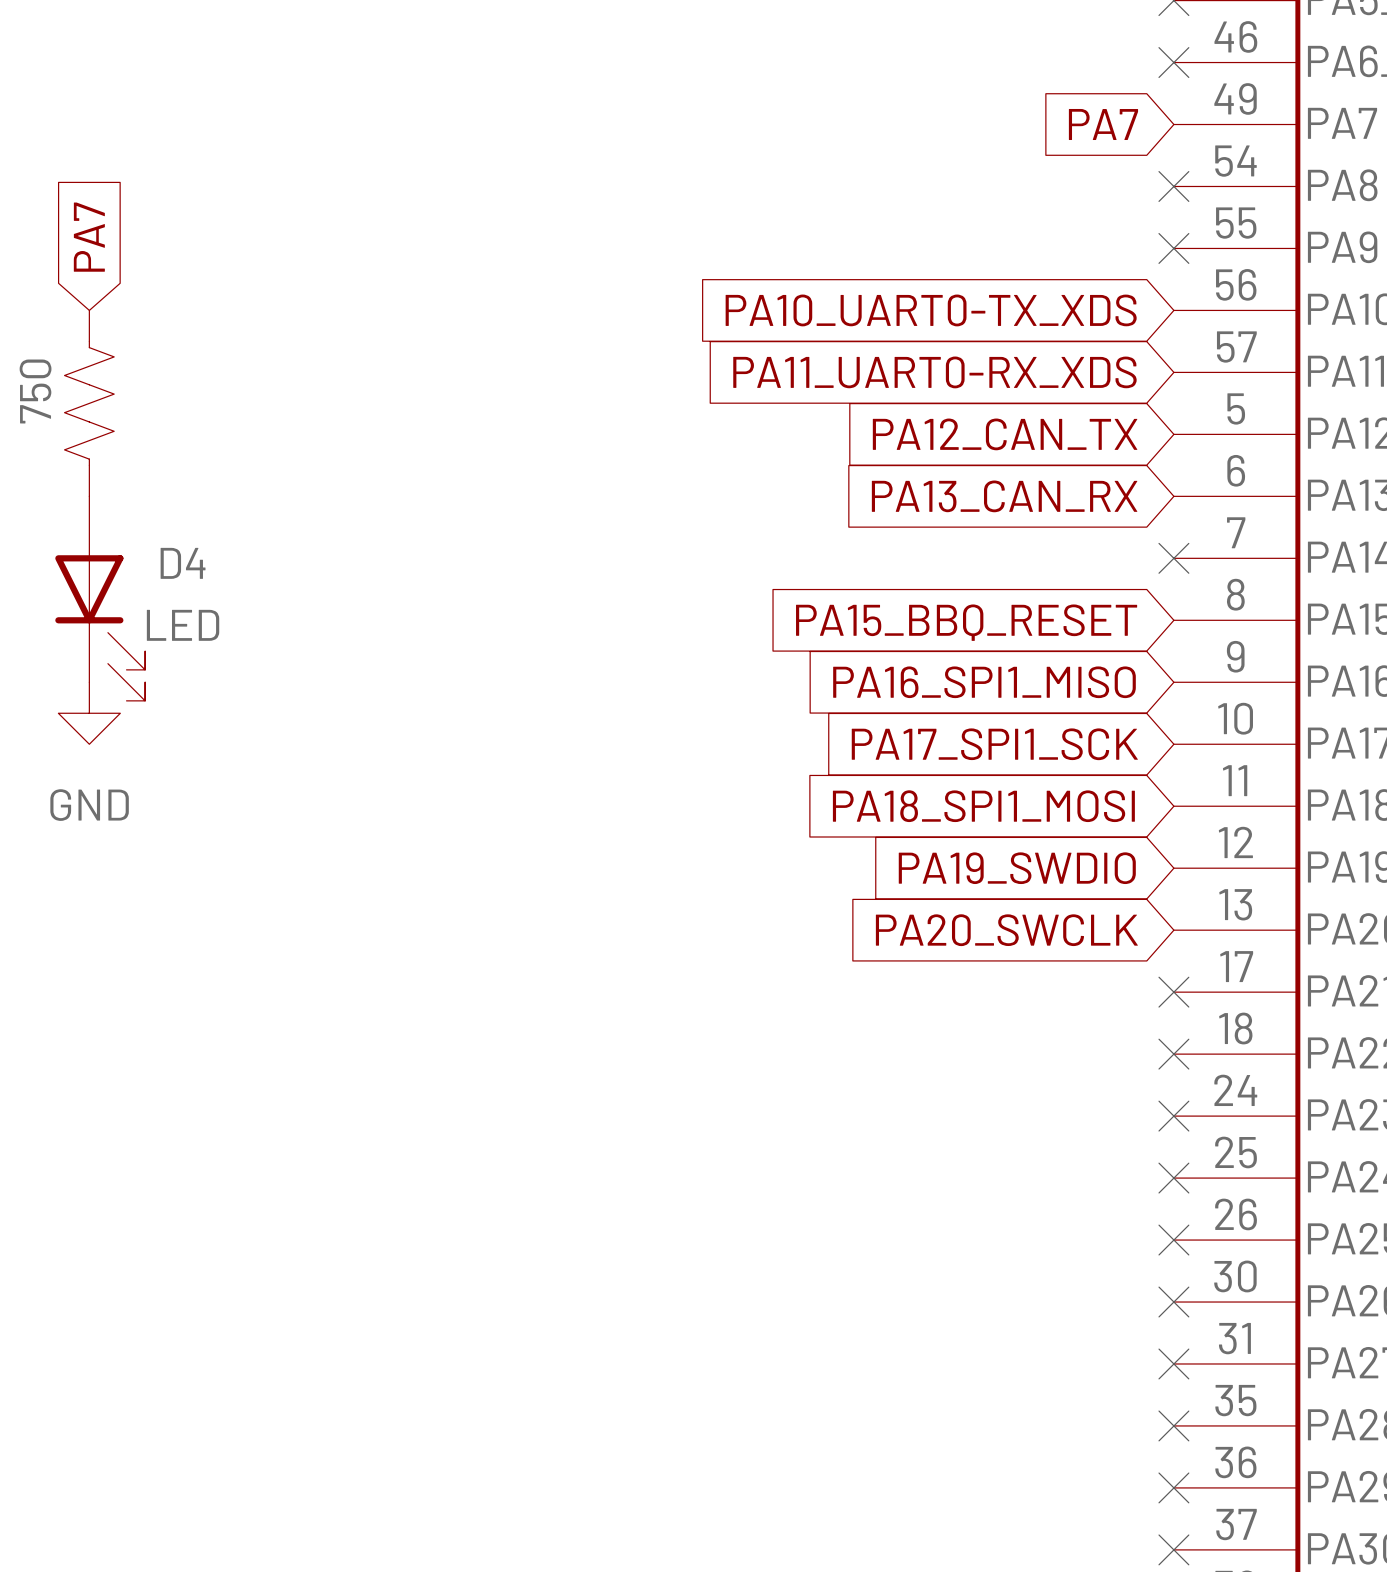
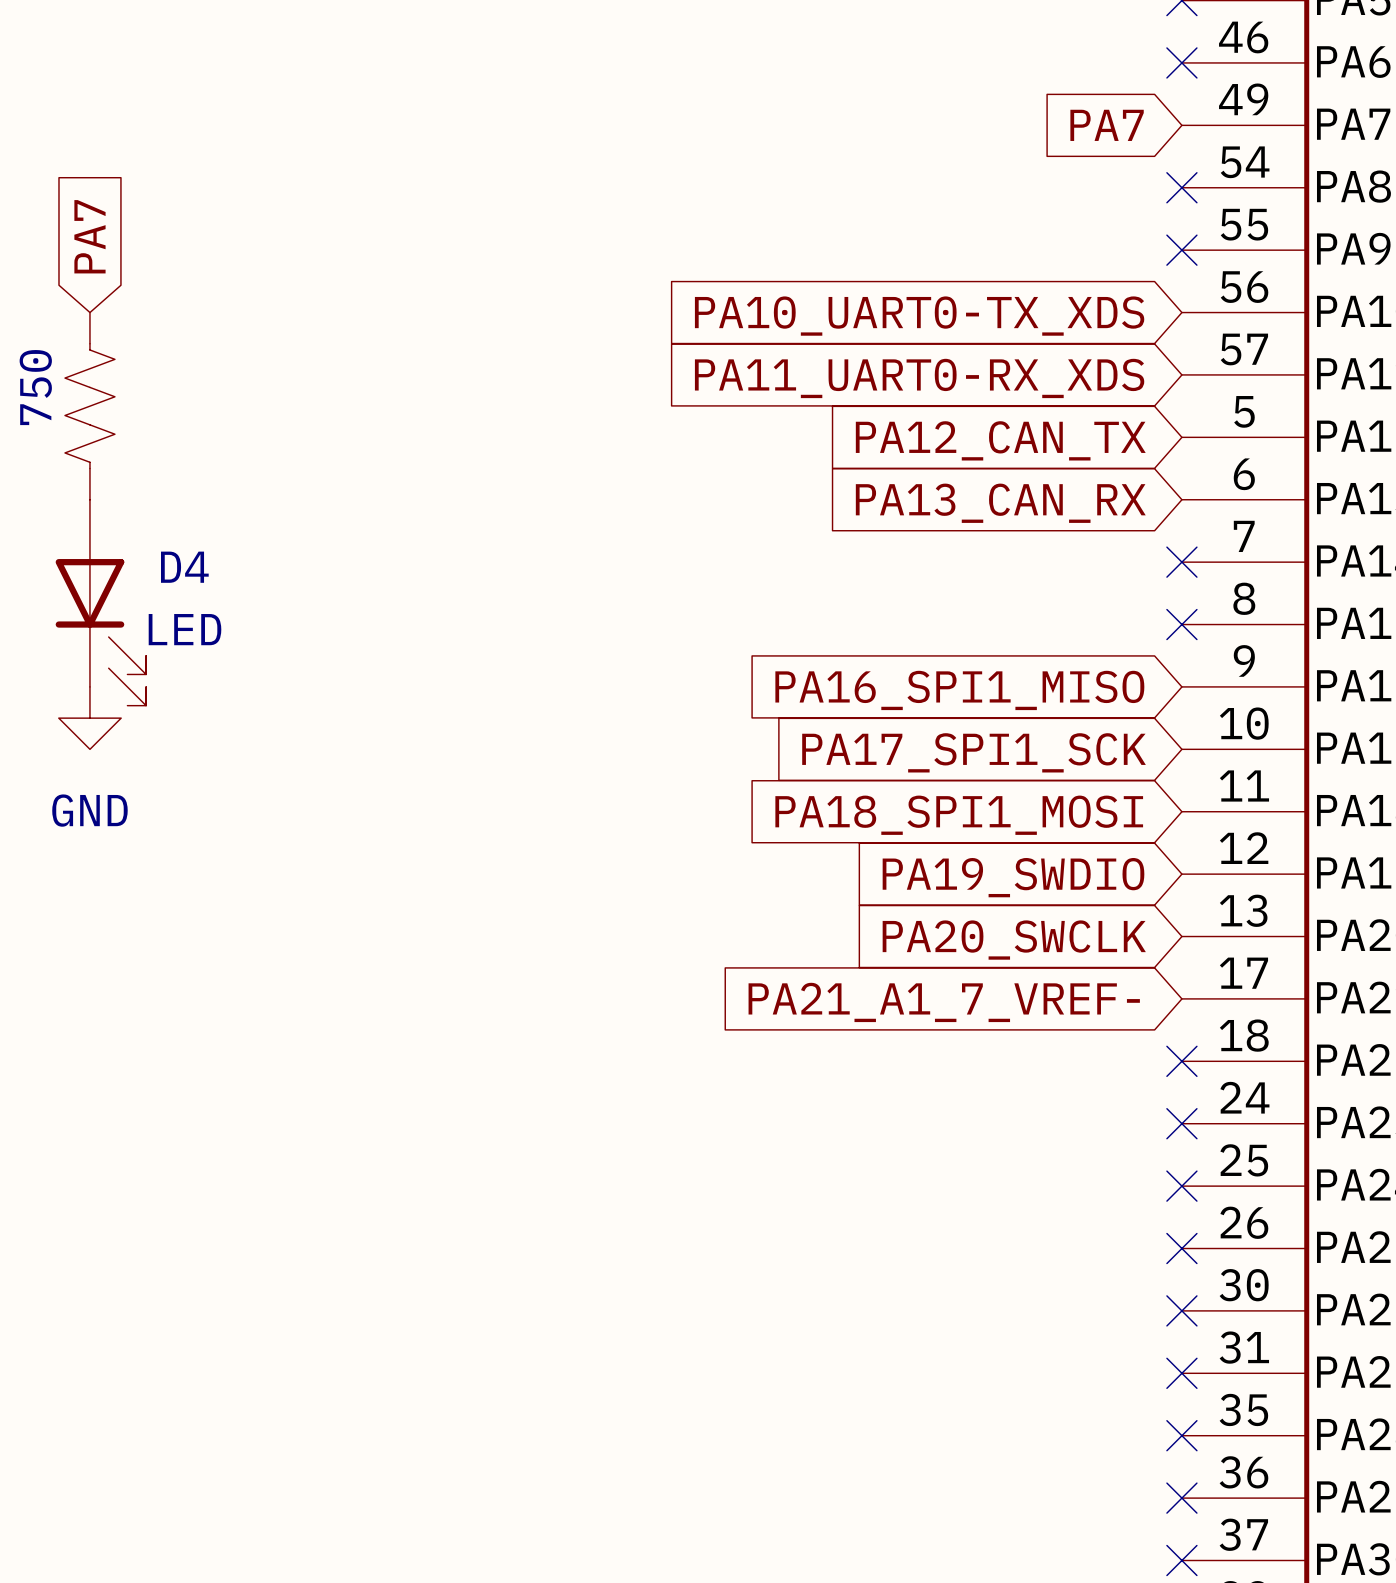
no-connect mark: none -> (1181, 624)
global label: PA15_BBQ_RESET (966, 622) -> none
global label: none -> PA21_A1_7_VREF- (944, 1002)
no-connect mark: (1173, 992) -> none

